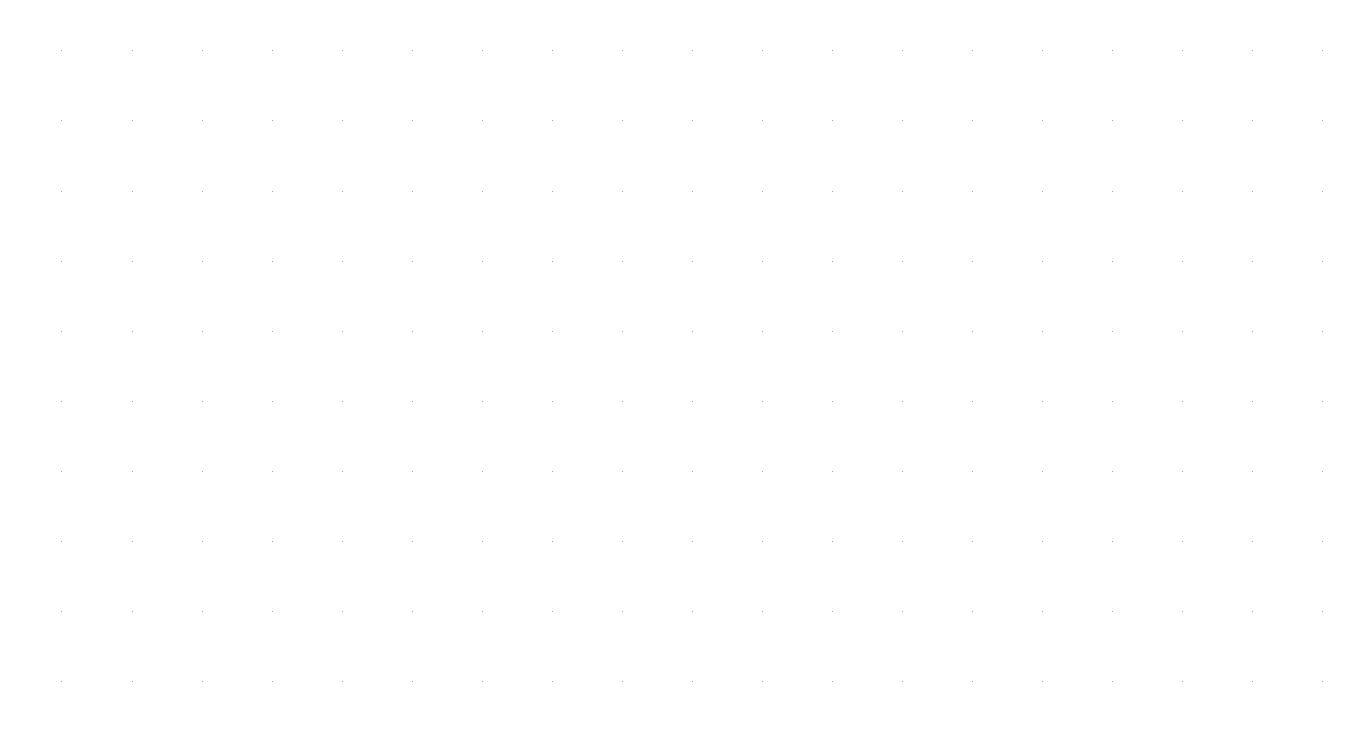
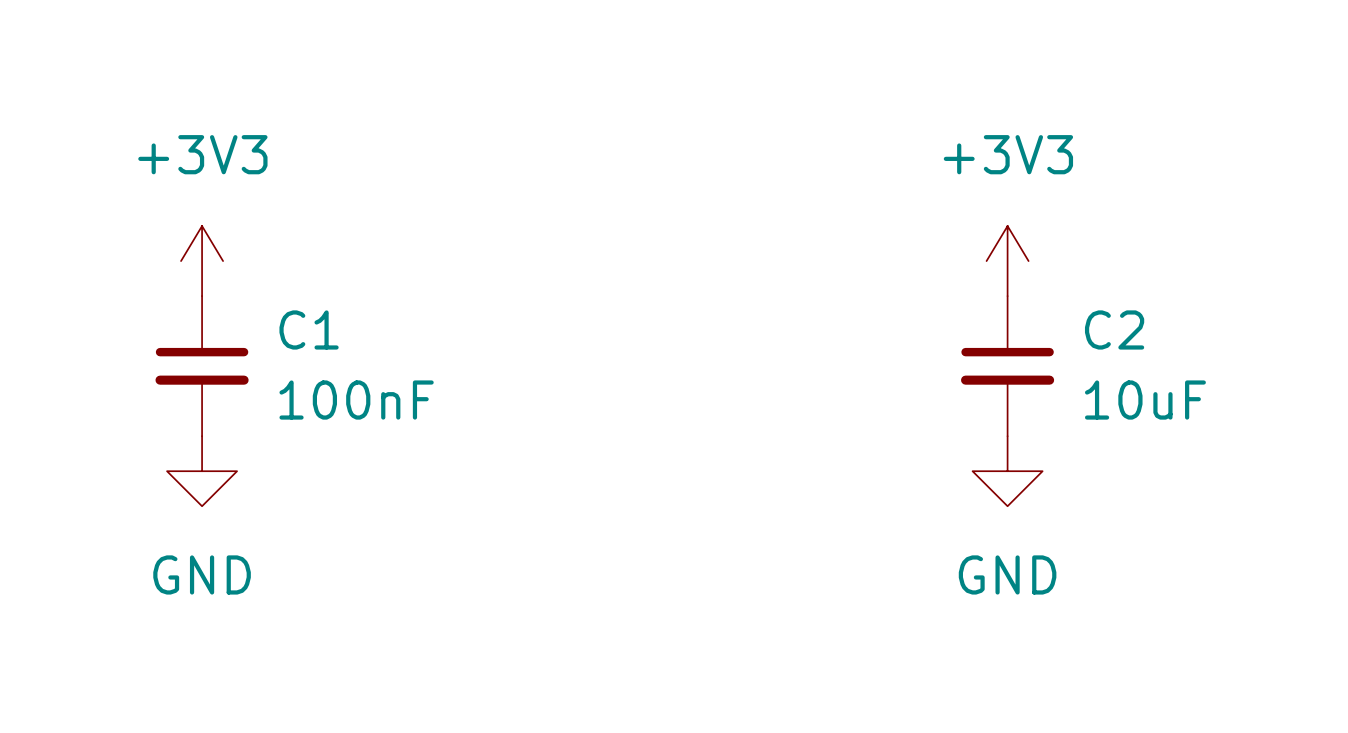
power symbol: none -> +3V3 (202, 261)
power symbol: none -> +3V3 (1007, 261)
C1: none -> 100nF (202, 366)
C2: none -> 10uF (1007, 366)
power symbol: none -> GND (202, 471)
power symbol: none -> GND (1007, 471)

